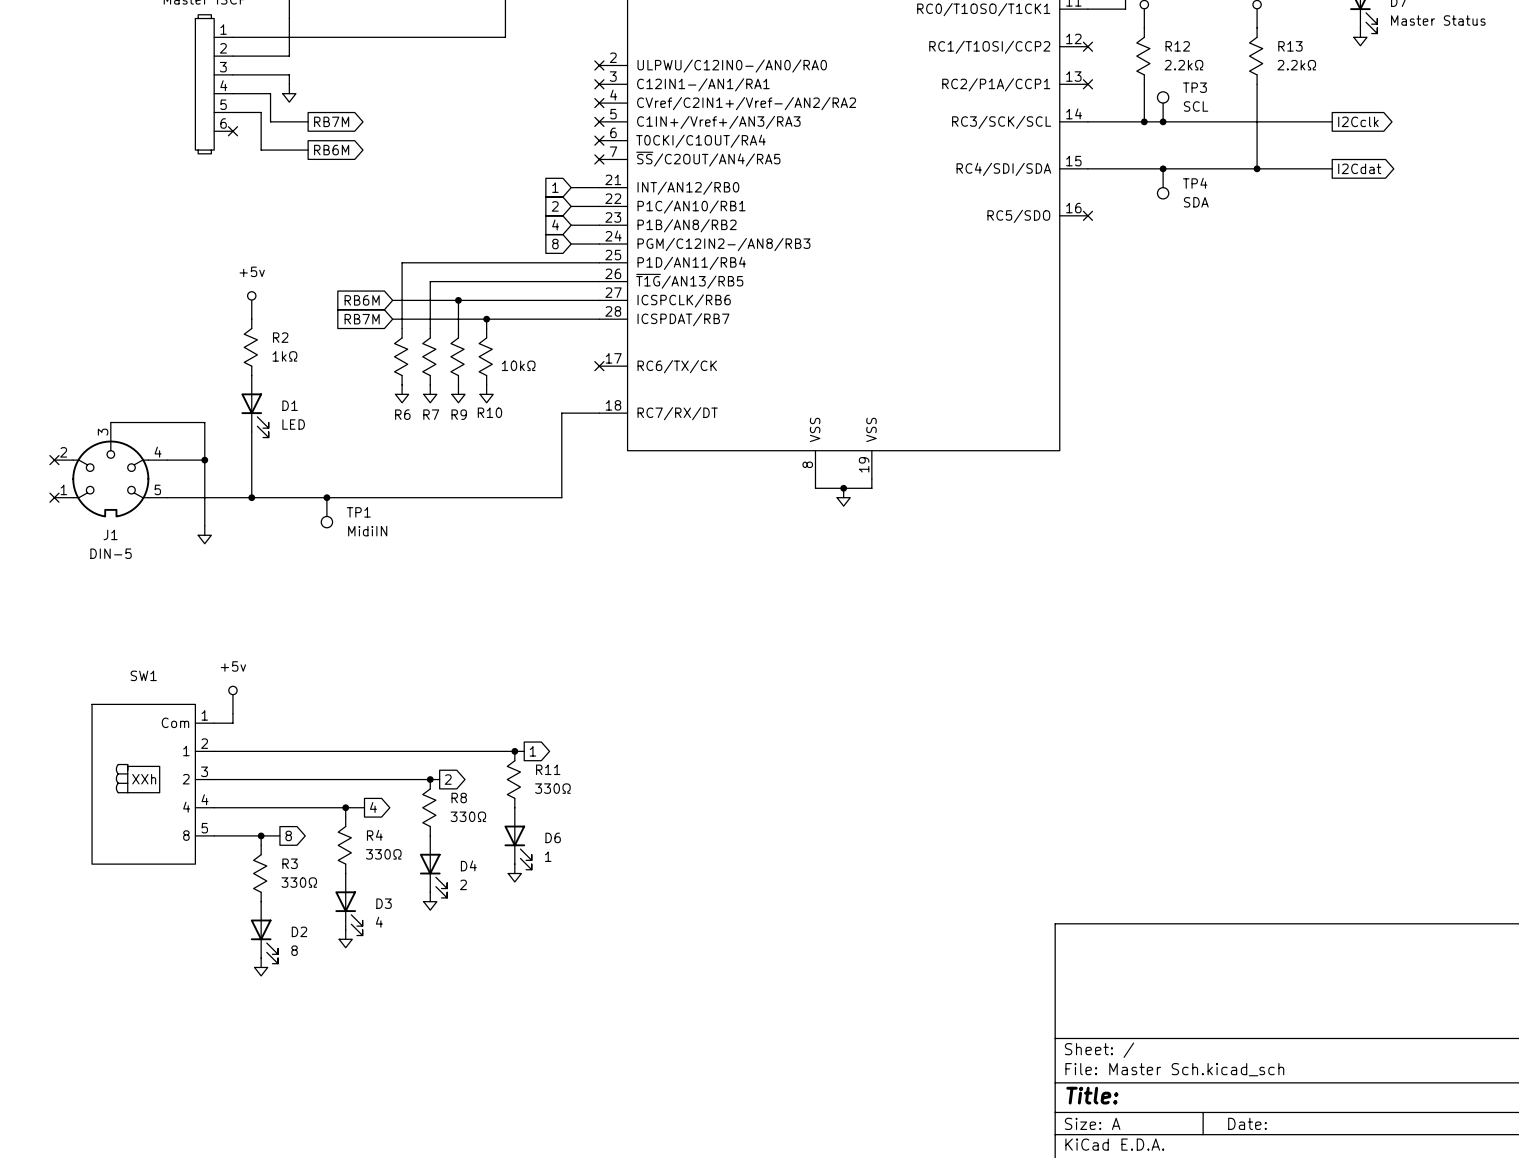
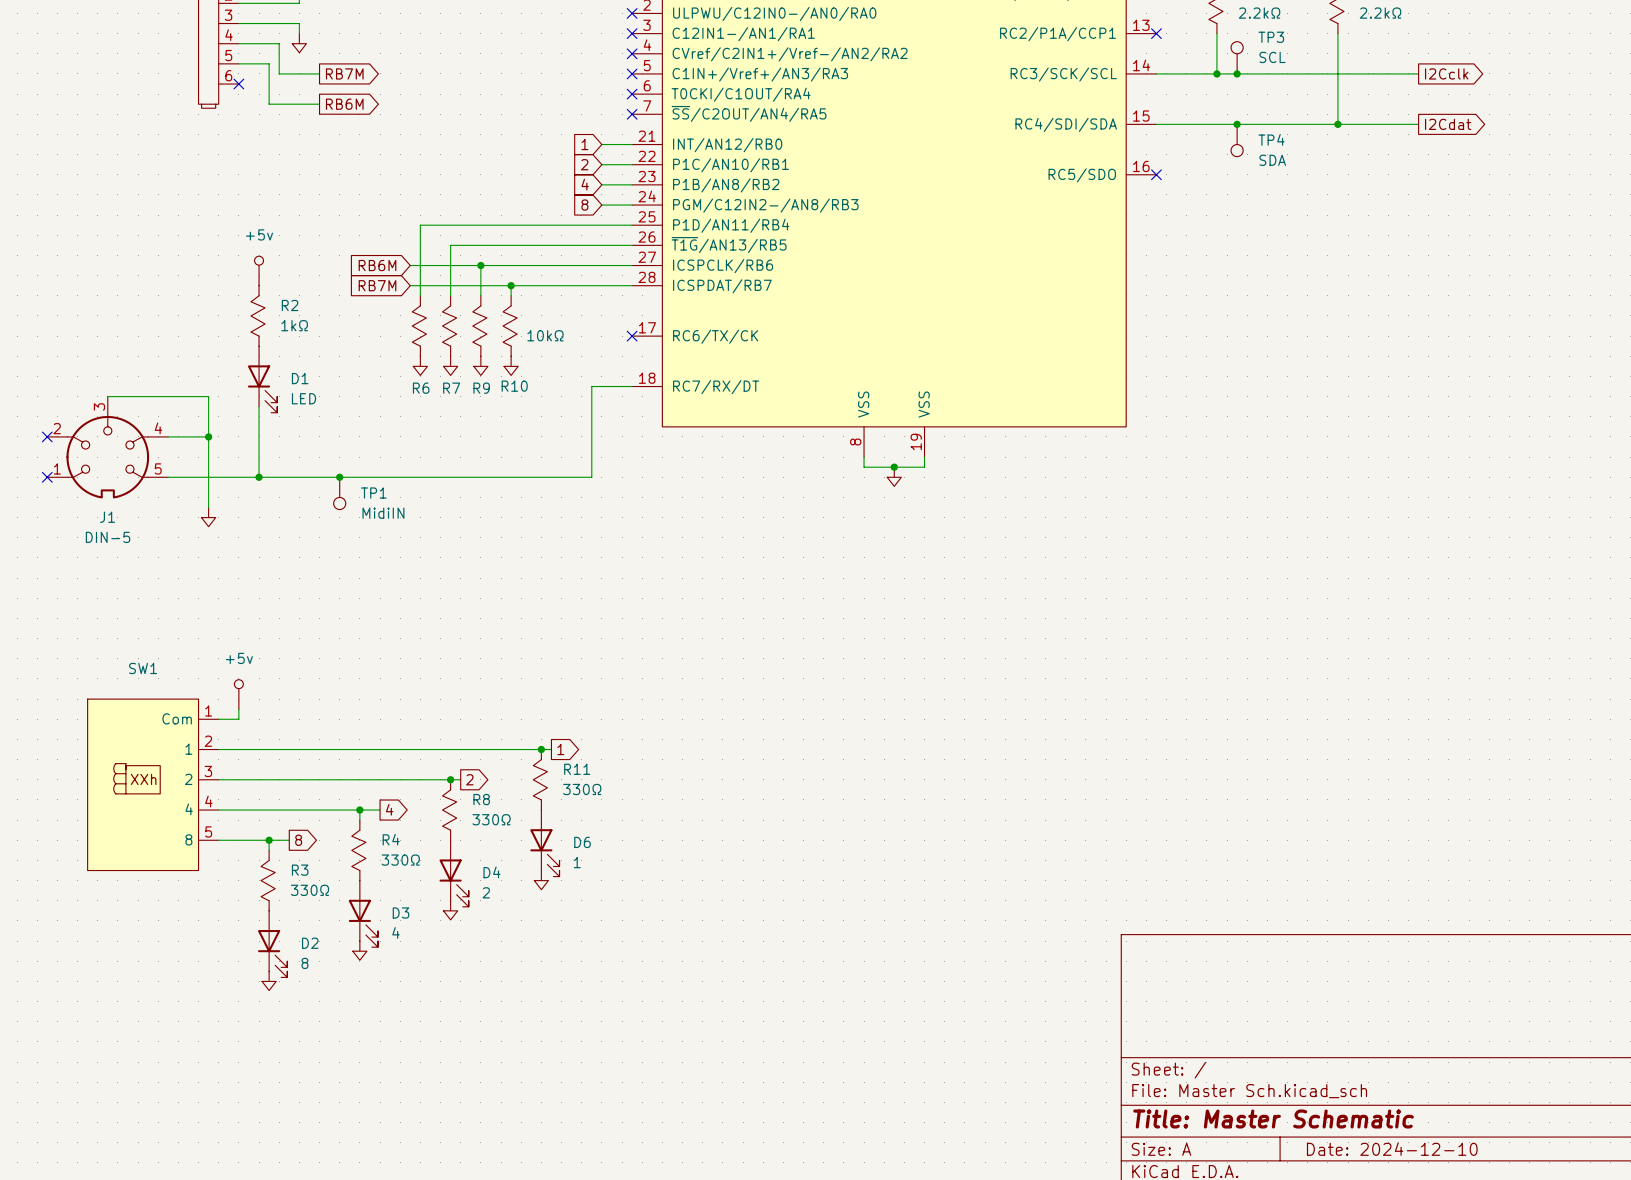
title block: Title: (1092, 1095) -> Title: Master Schematic (1273, 1118)
title block: Date: (1247, 1123) -> Date: 2024-12-10 (1392, 1149)

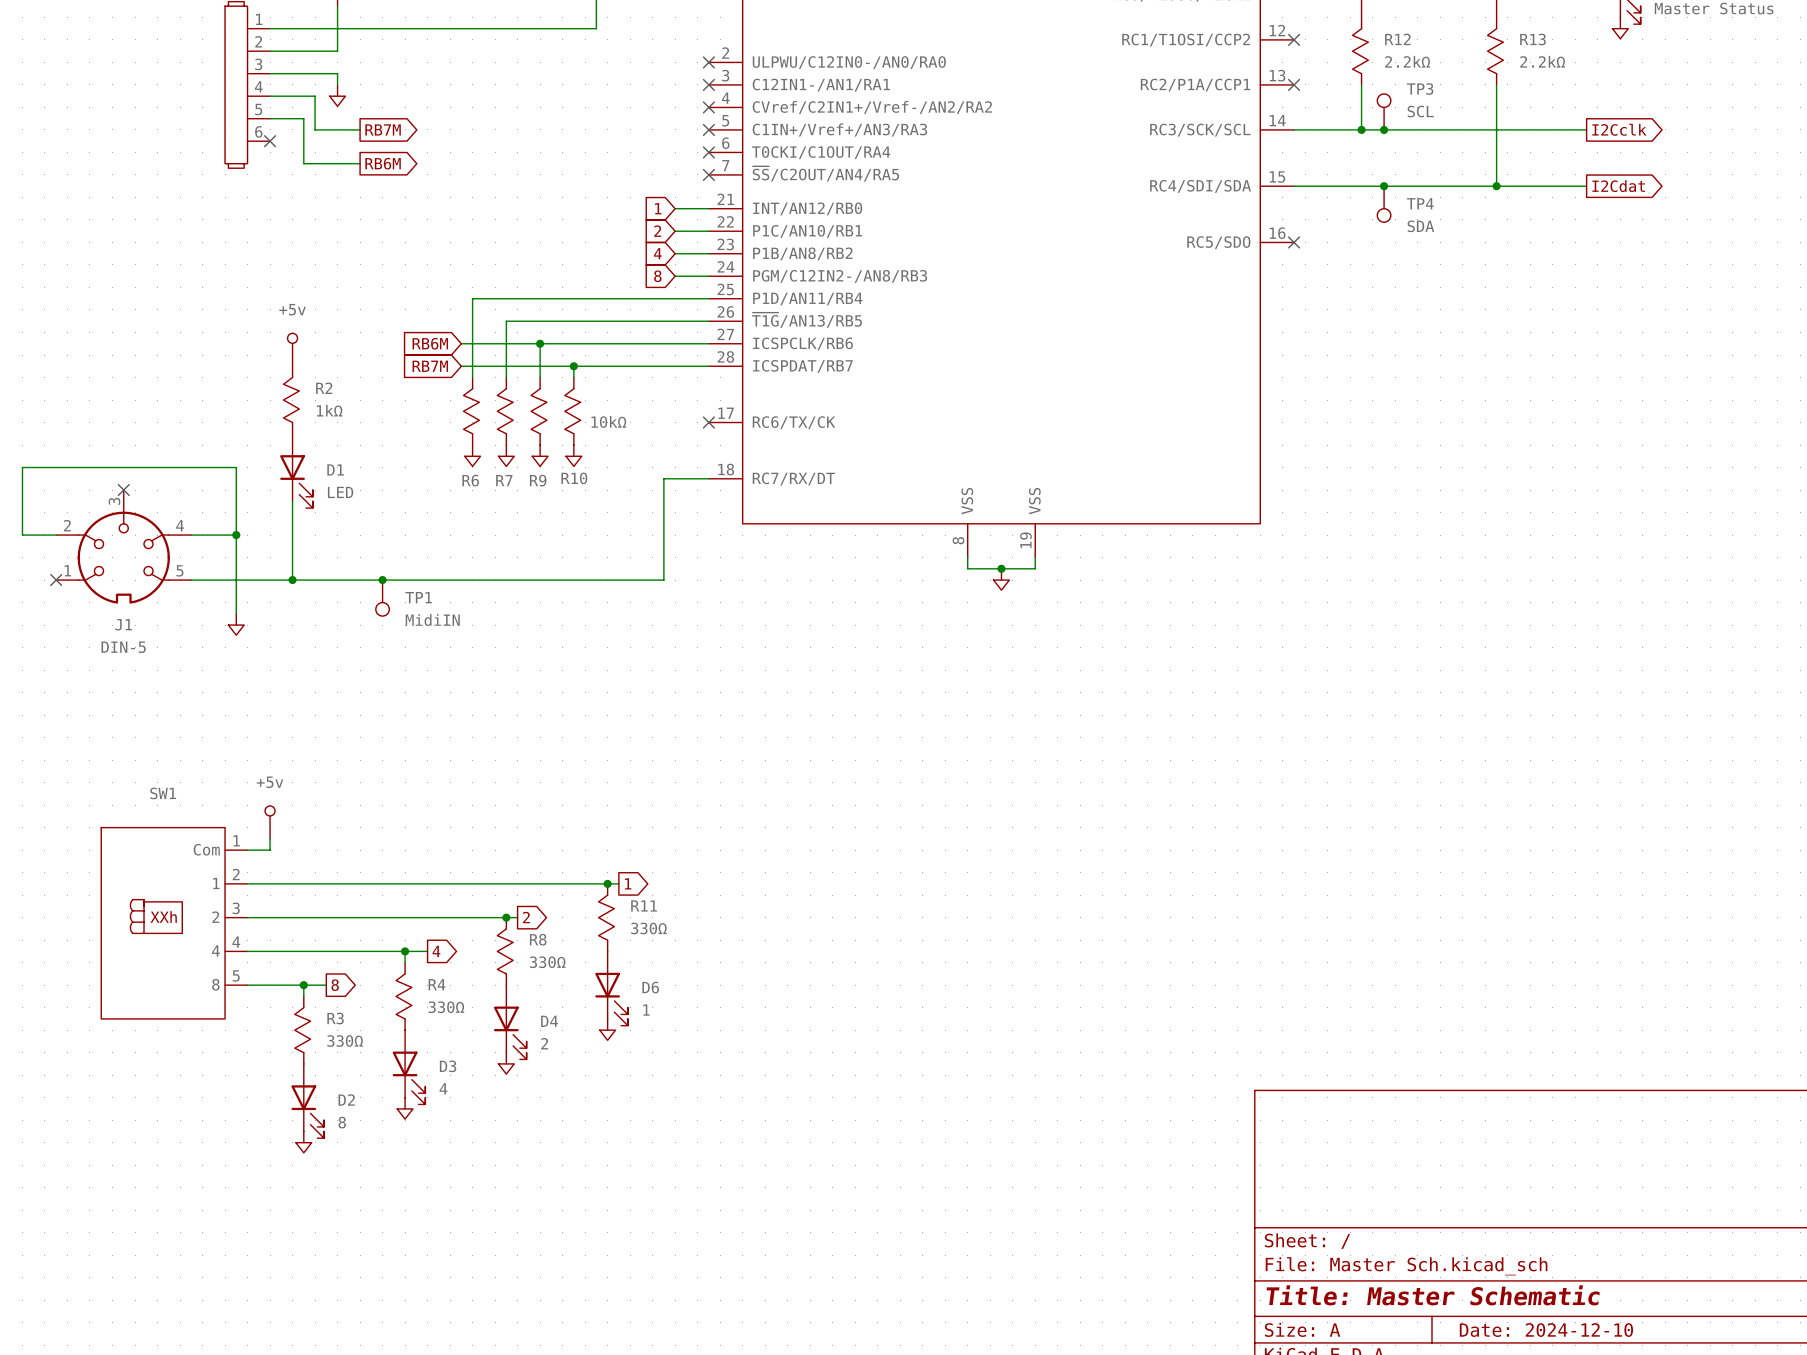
wire: (107, 396) (208, 396) -> (56, 535) (22, 535) (22, 467) (236, 467) (236, 490)
no-connect mark: none -> (123, 490)
no-connect mark: (47, 436) -> none

